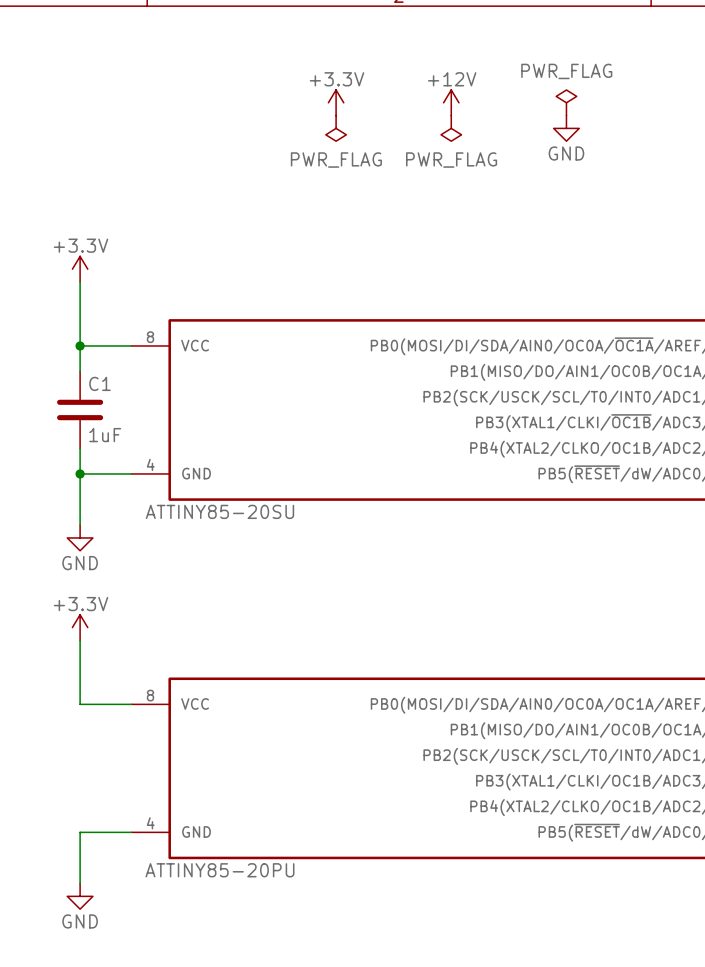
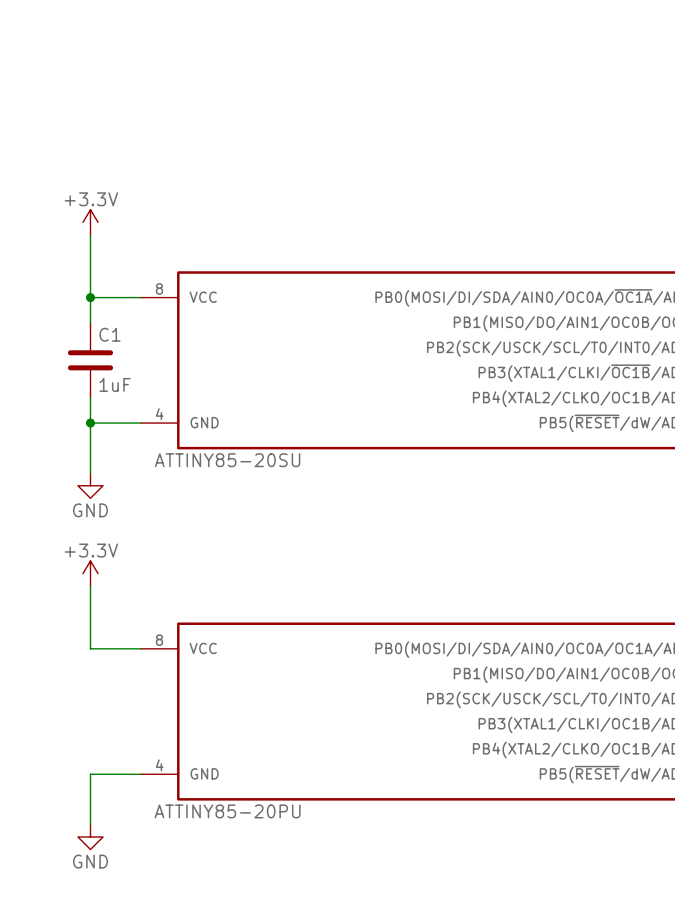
power symbol: +3.3V (336, 102) -> none
power symbol: +12V (451, 102) -> none
power symbol: PWR_FLAG (566, 102) -> none
power symbol: PWR_FLAG (336, 128) -> none
power symbol: PWR_FLAG (451, 128) -> none
power symbol: GND (566, 128) -> none

